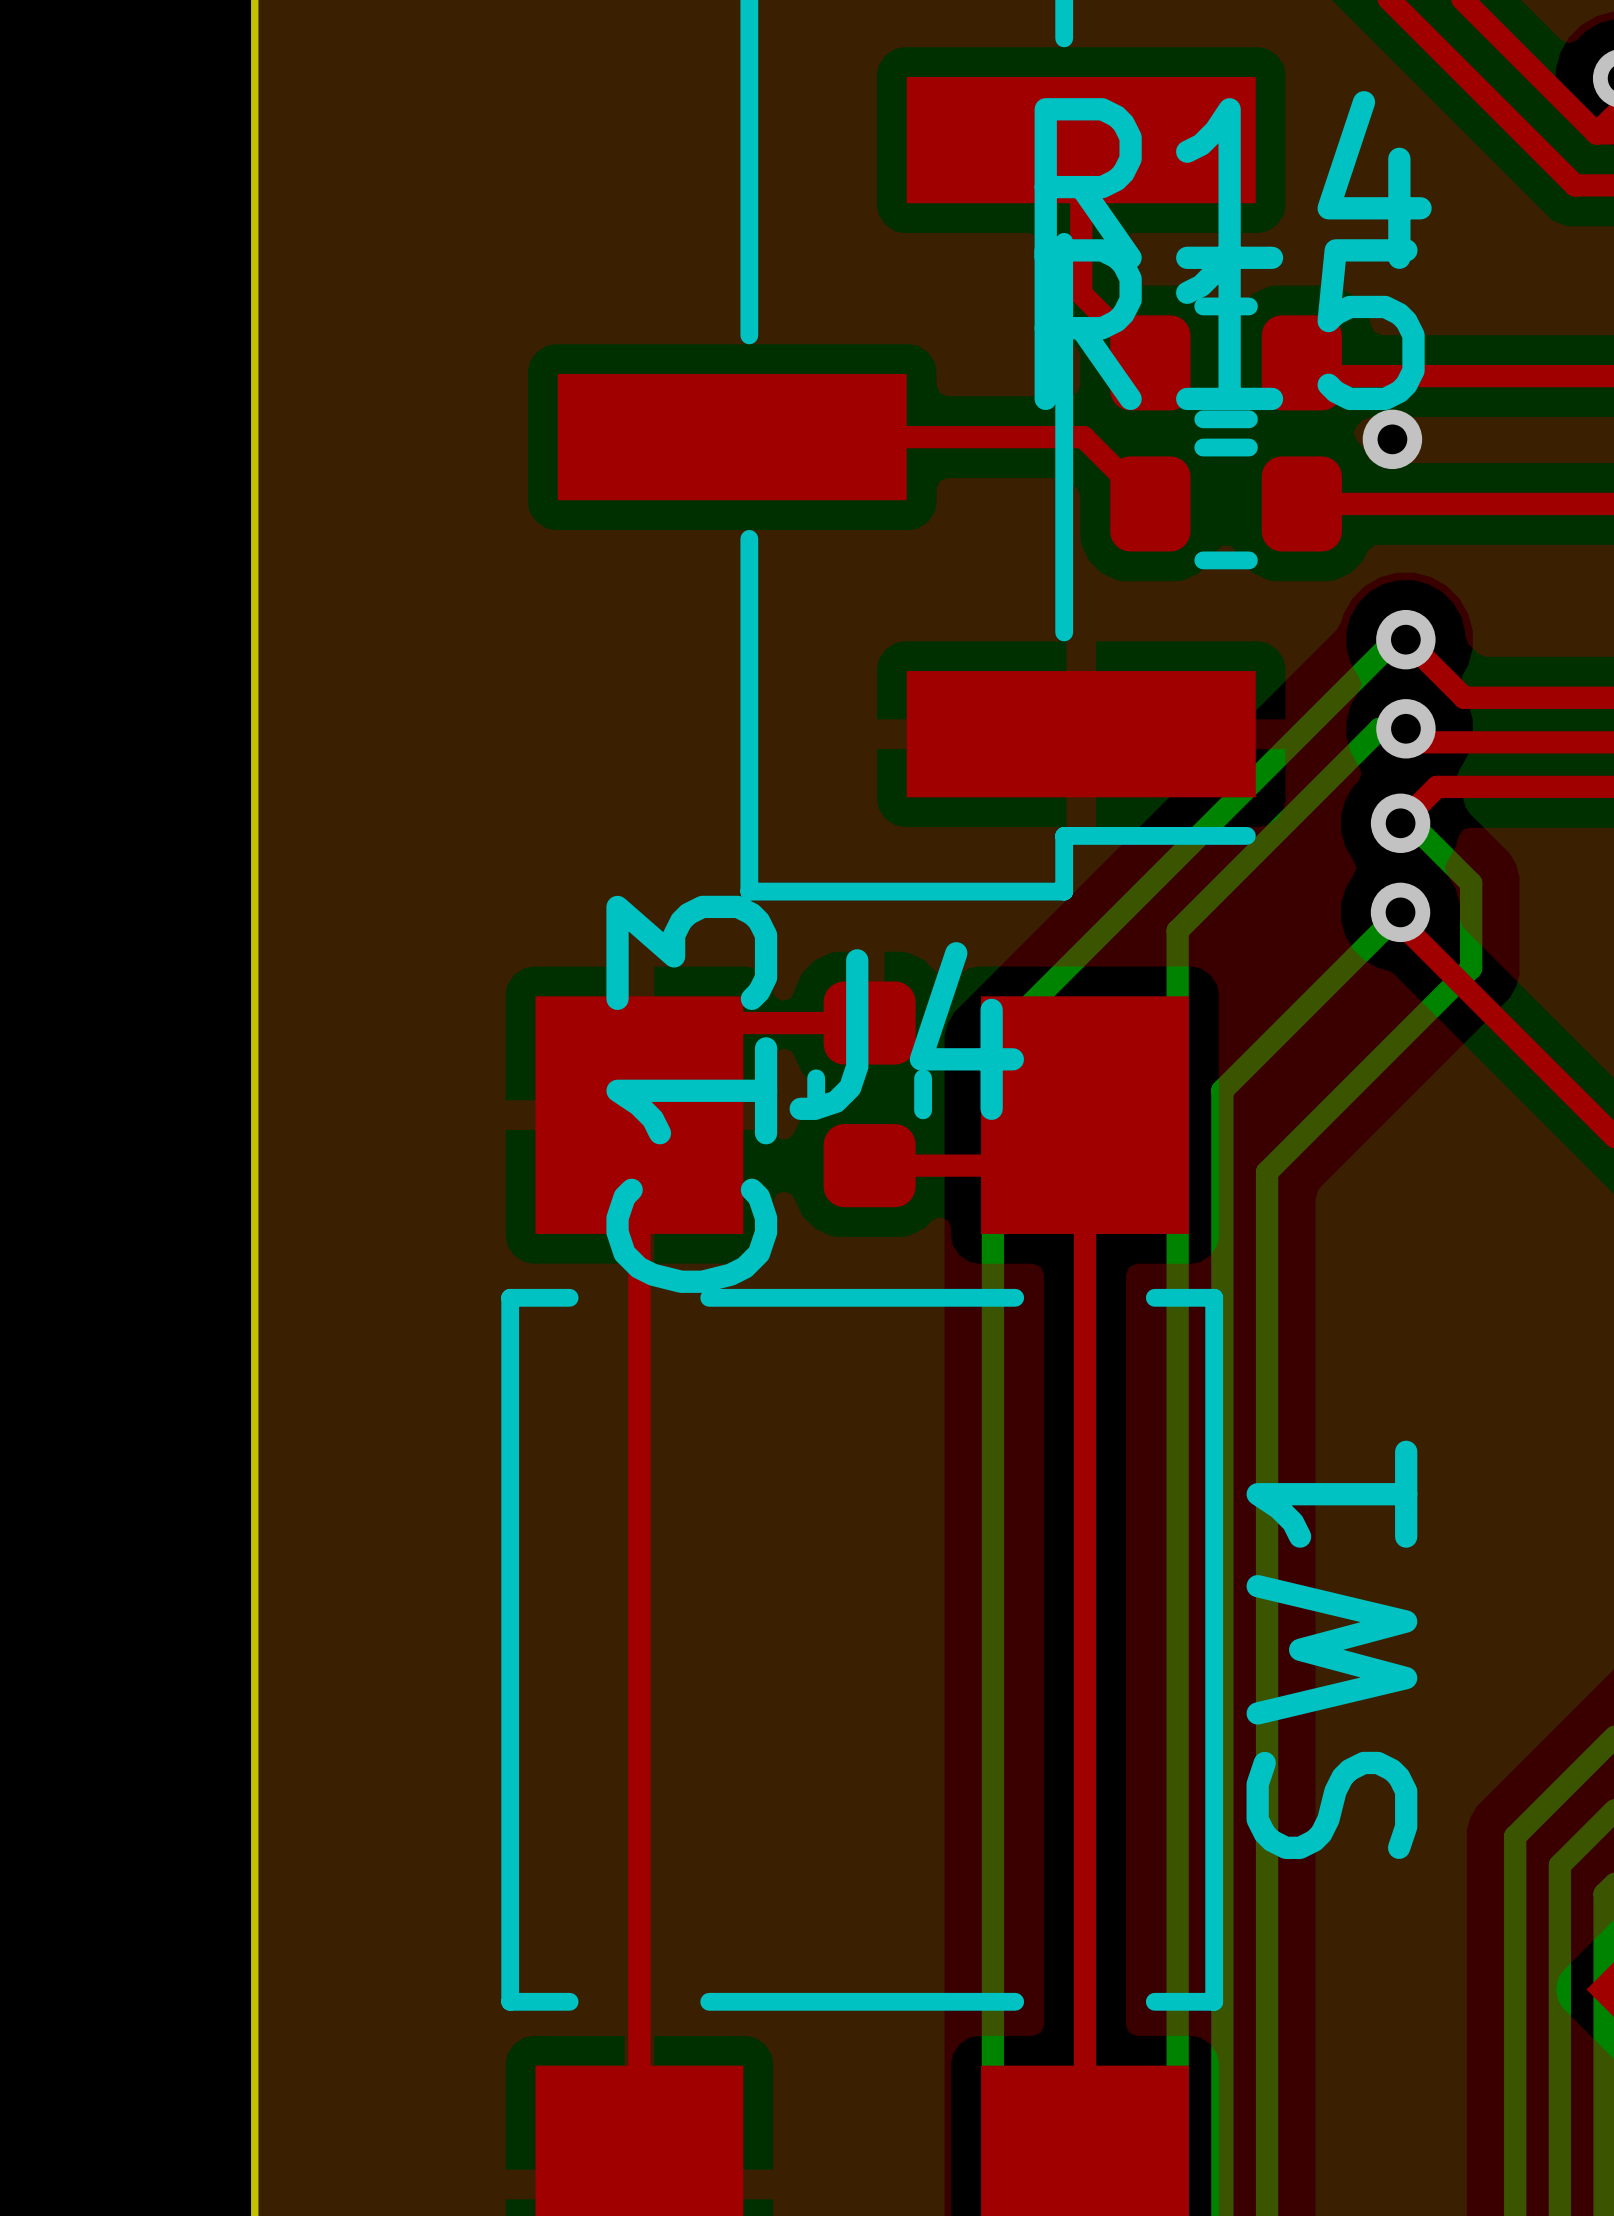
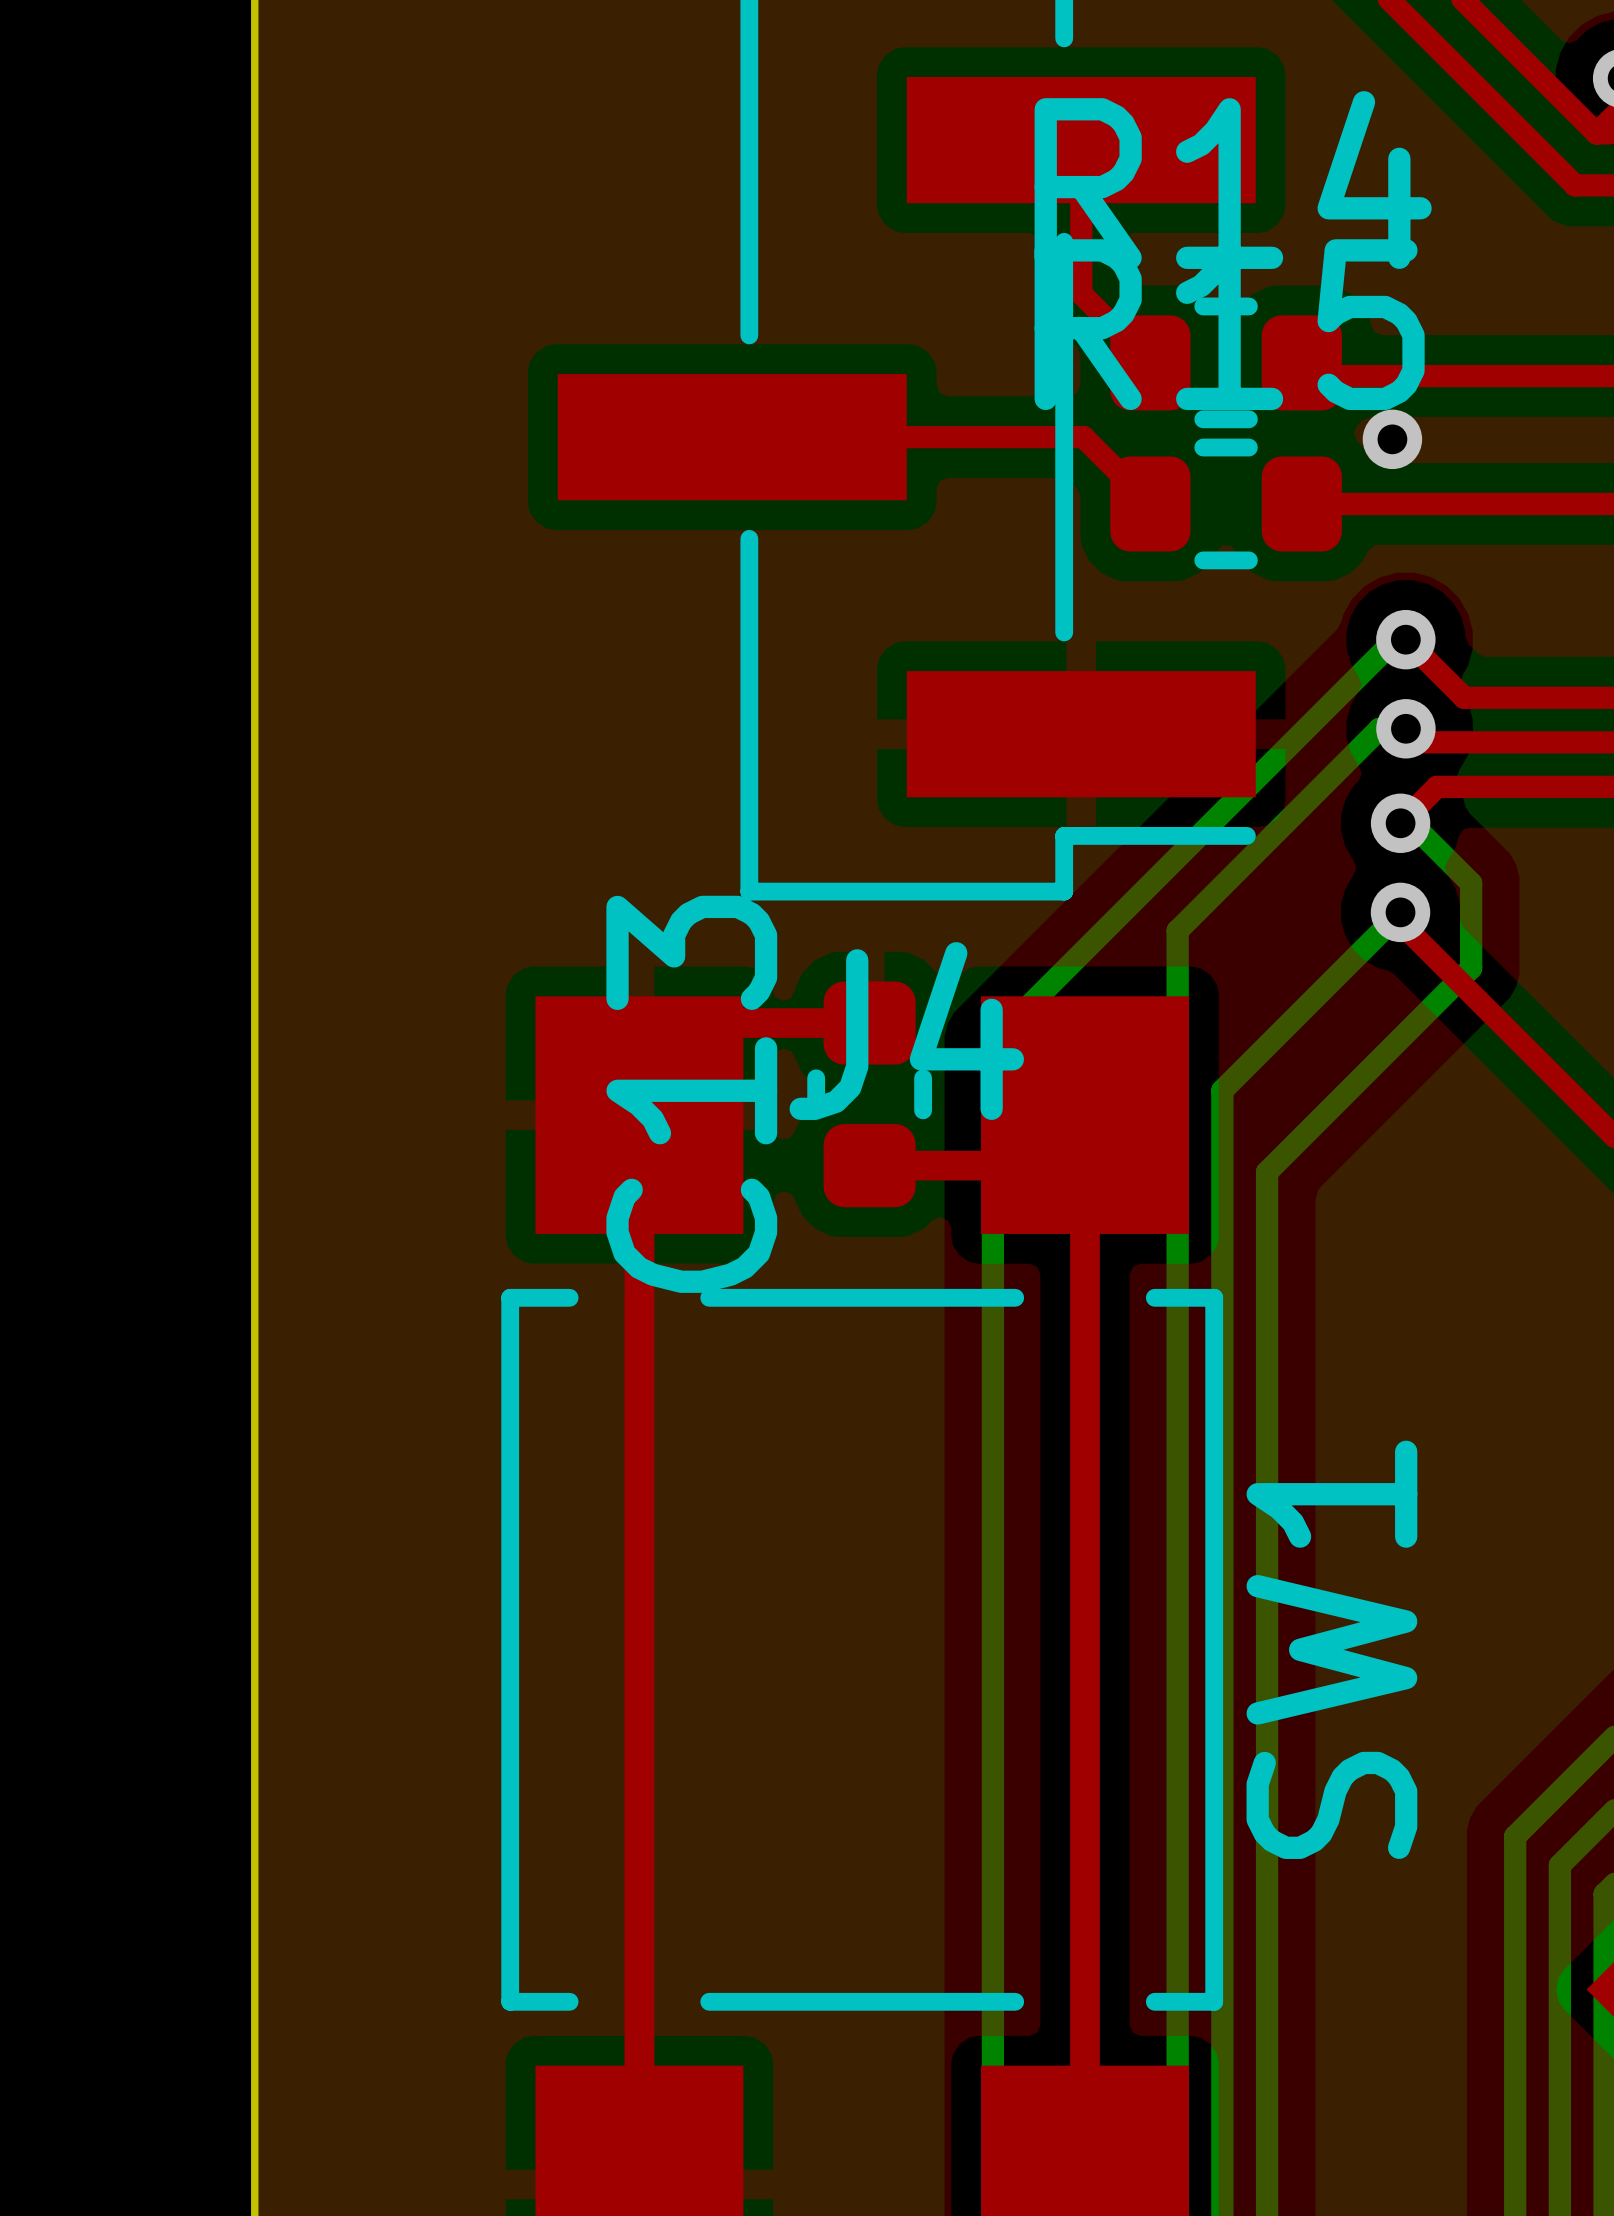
top track width: thin (869, 1023) (731, 1023) (639, 1115) (639, 2184) -> thick (869, 1023) (731, 1023) (639, 1115) (639, 2184)
top track width: thin (1084, 1115) (1084, 2184) -> thick (1084, 1115) (1084, 2184)
top track width: thin (869, 1165) (1010, 1165) -> thick (869, 1165) (1010, 1165)

